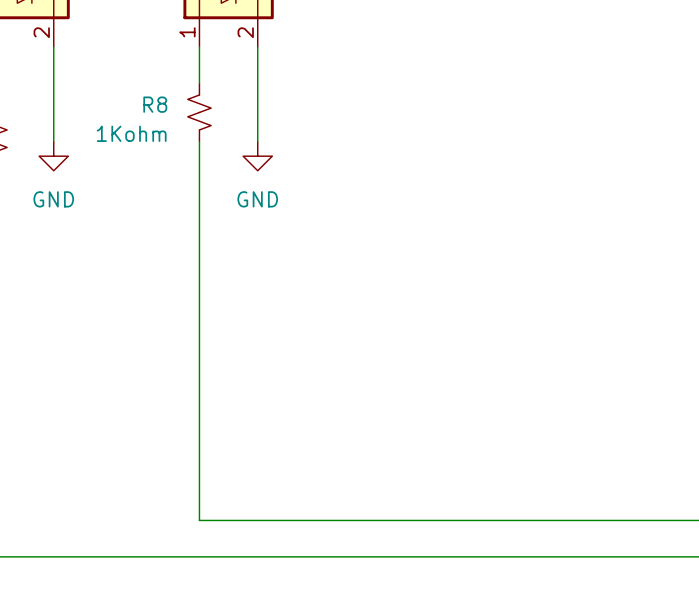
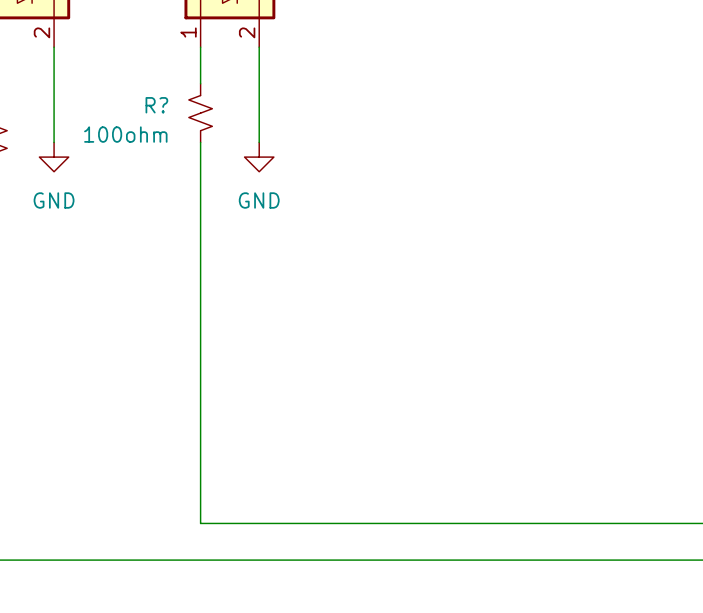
R8 name: R8 (155, 104) -> R? (156, 105)
R8 value: 1Kohm (131, 133) -> 100ohm (125, 134)

